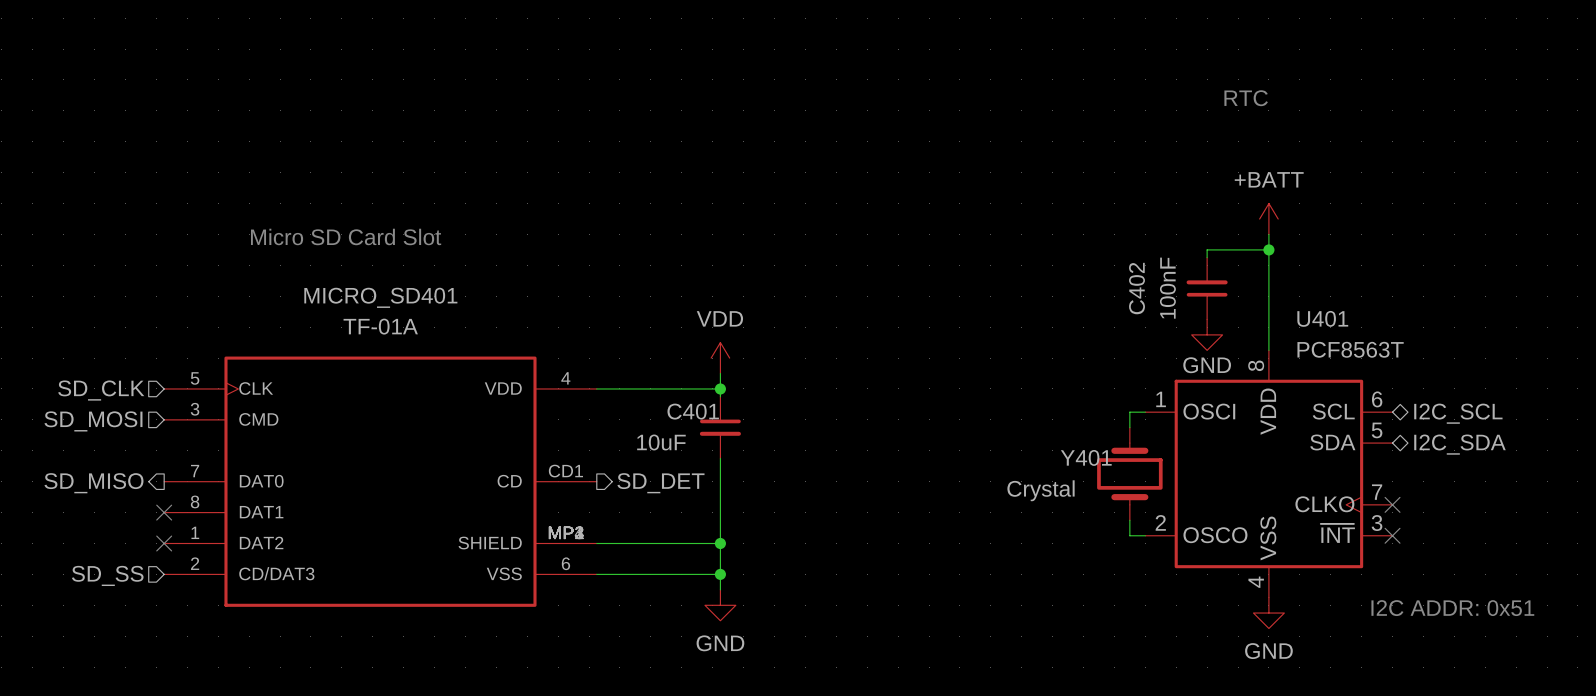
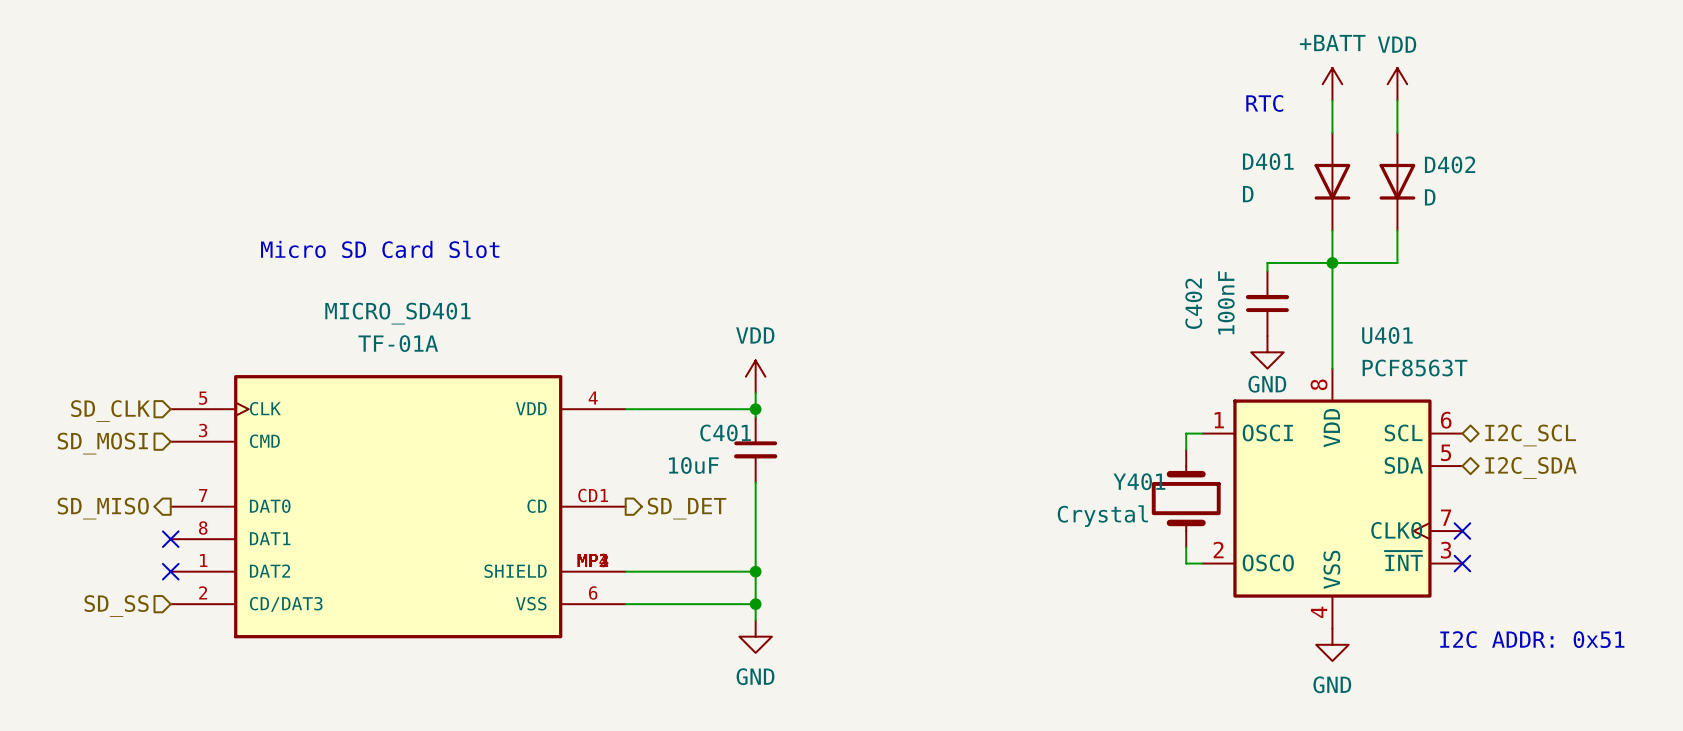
power symbol: none -> VDD (1397, 84)
wire: none -> (1332, 100) (1332, 132)
wire: none -> (1397, 100) (1397, 132)
text position: RTC (1246, 98) -> RTC (1264, 103)
D401: none -> D (1332, 181)
D402: none -> D (1397, 181)
power symbol position: +BATT (1268, 219) -> +BATT (1332, 84)
wire: none -> (1397, 230) (1397, 262) (1332, 262)

